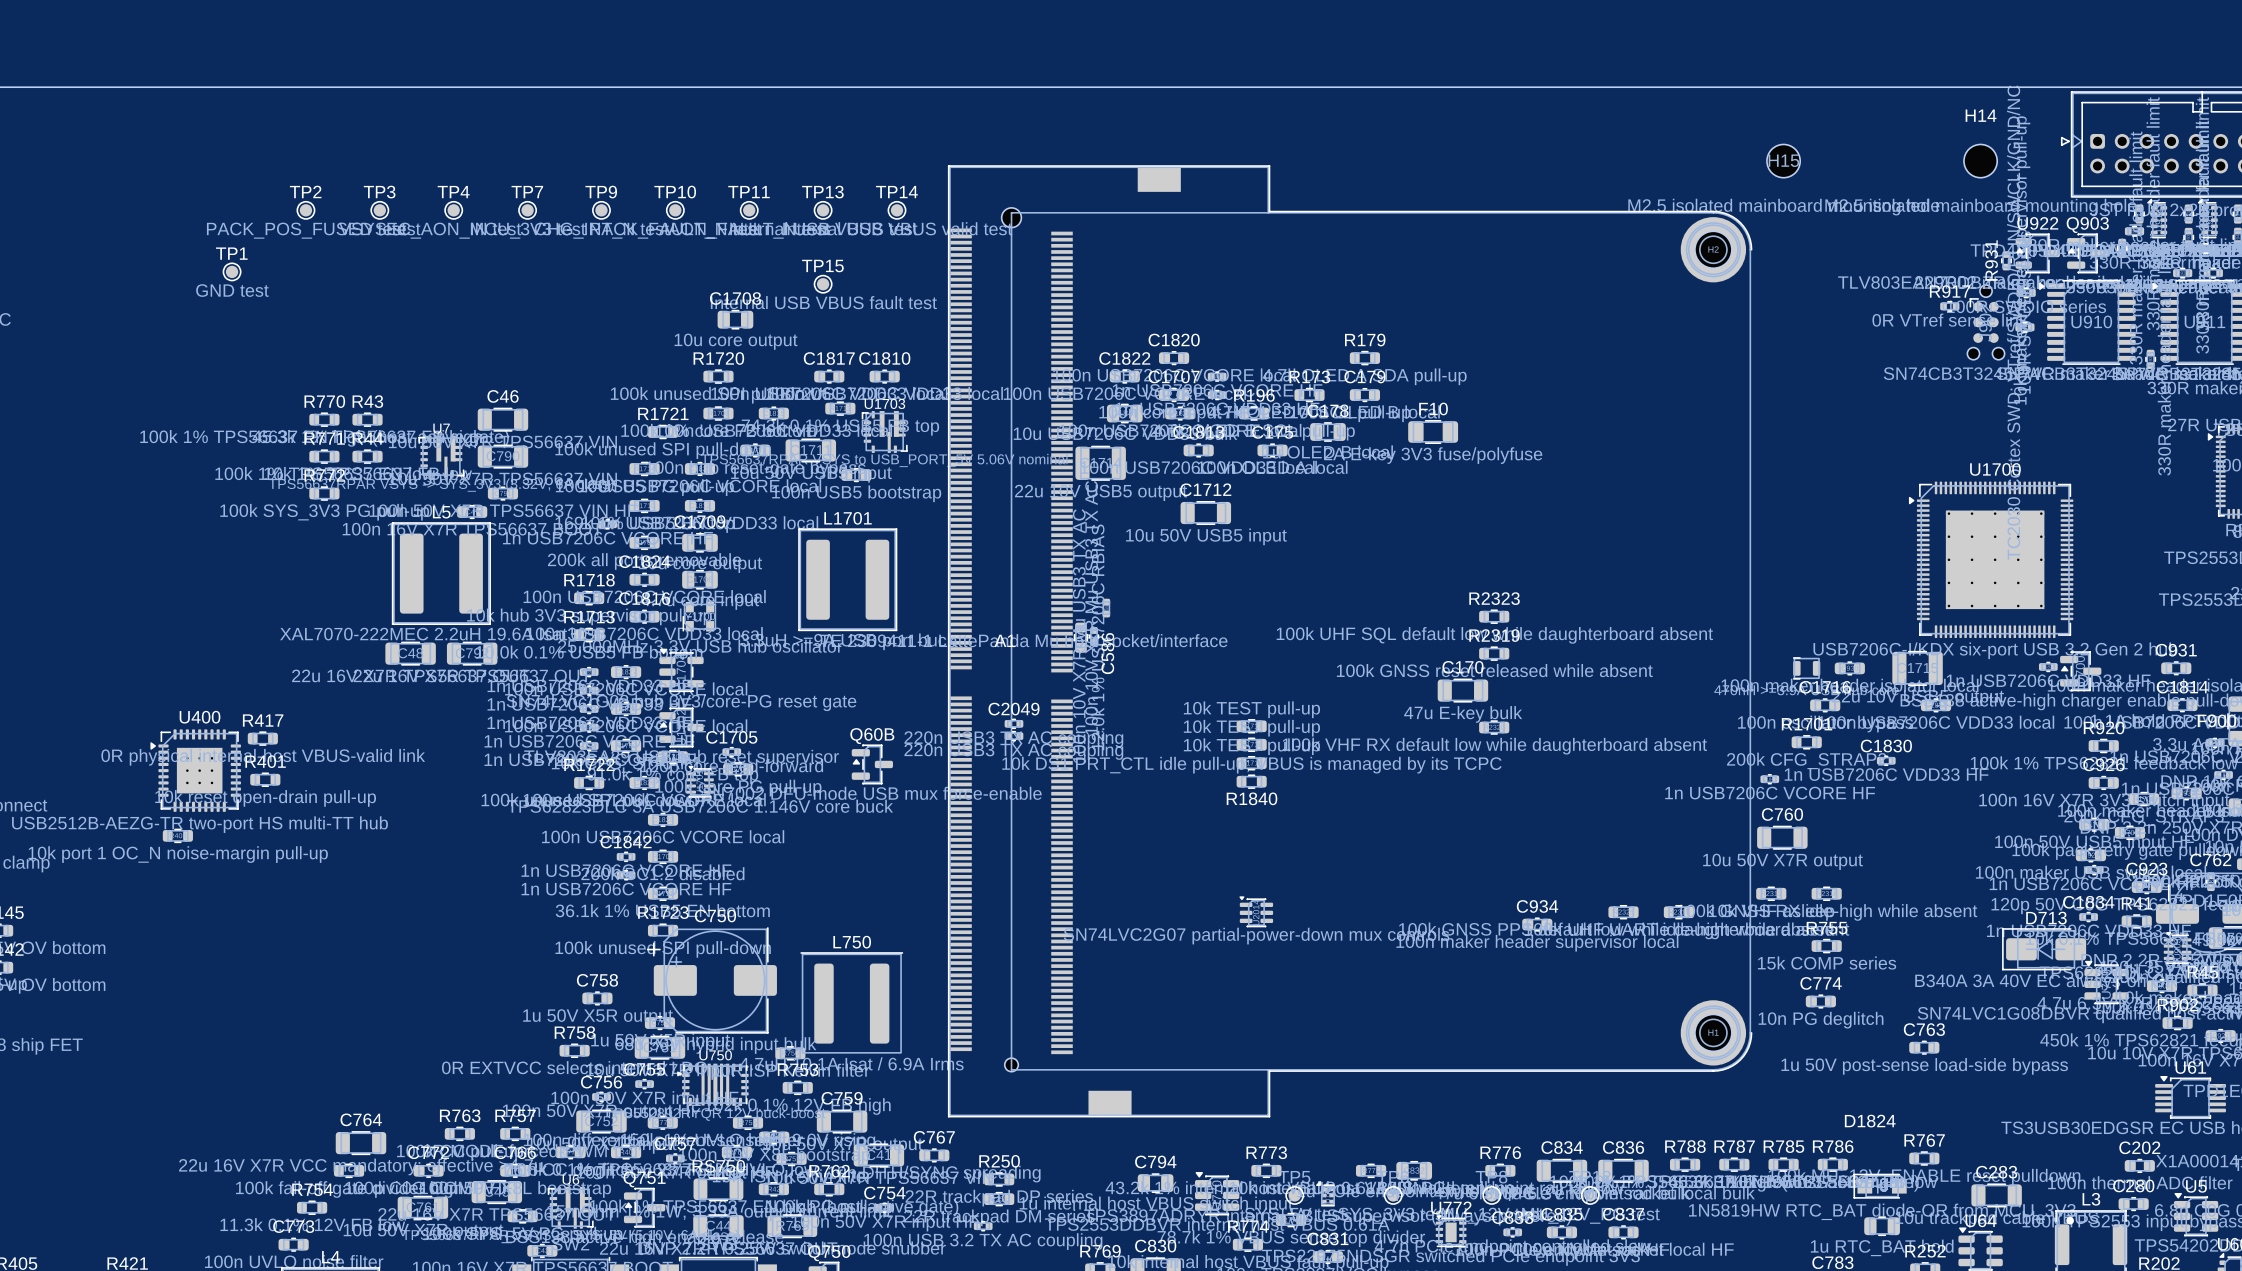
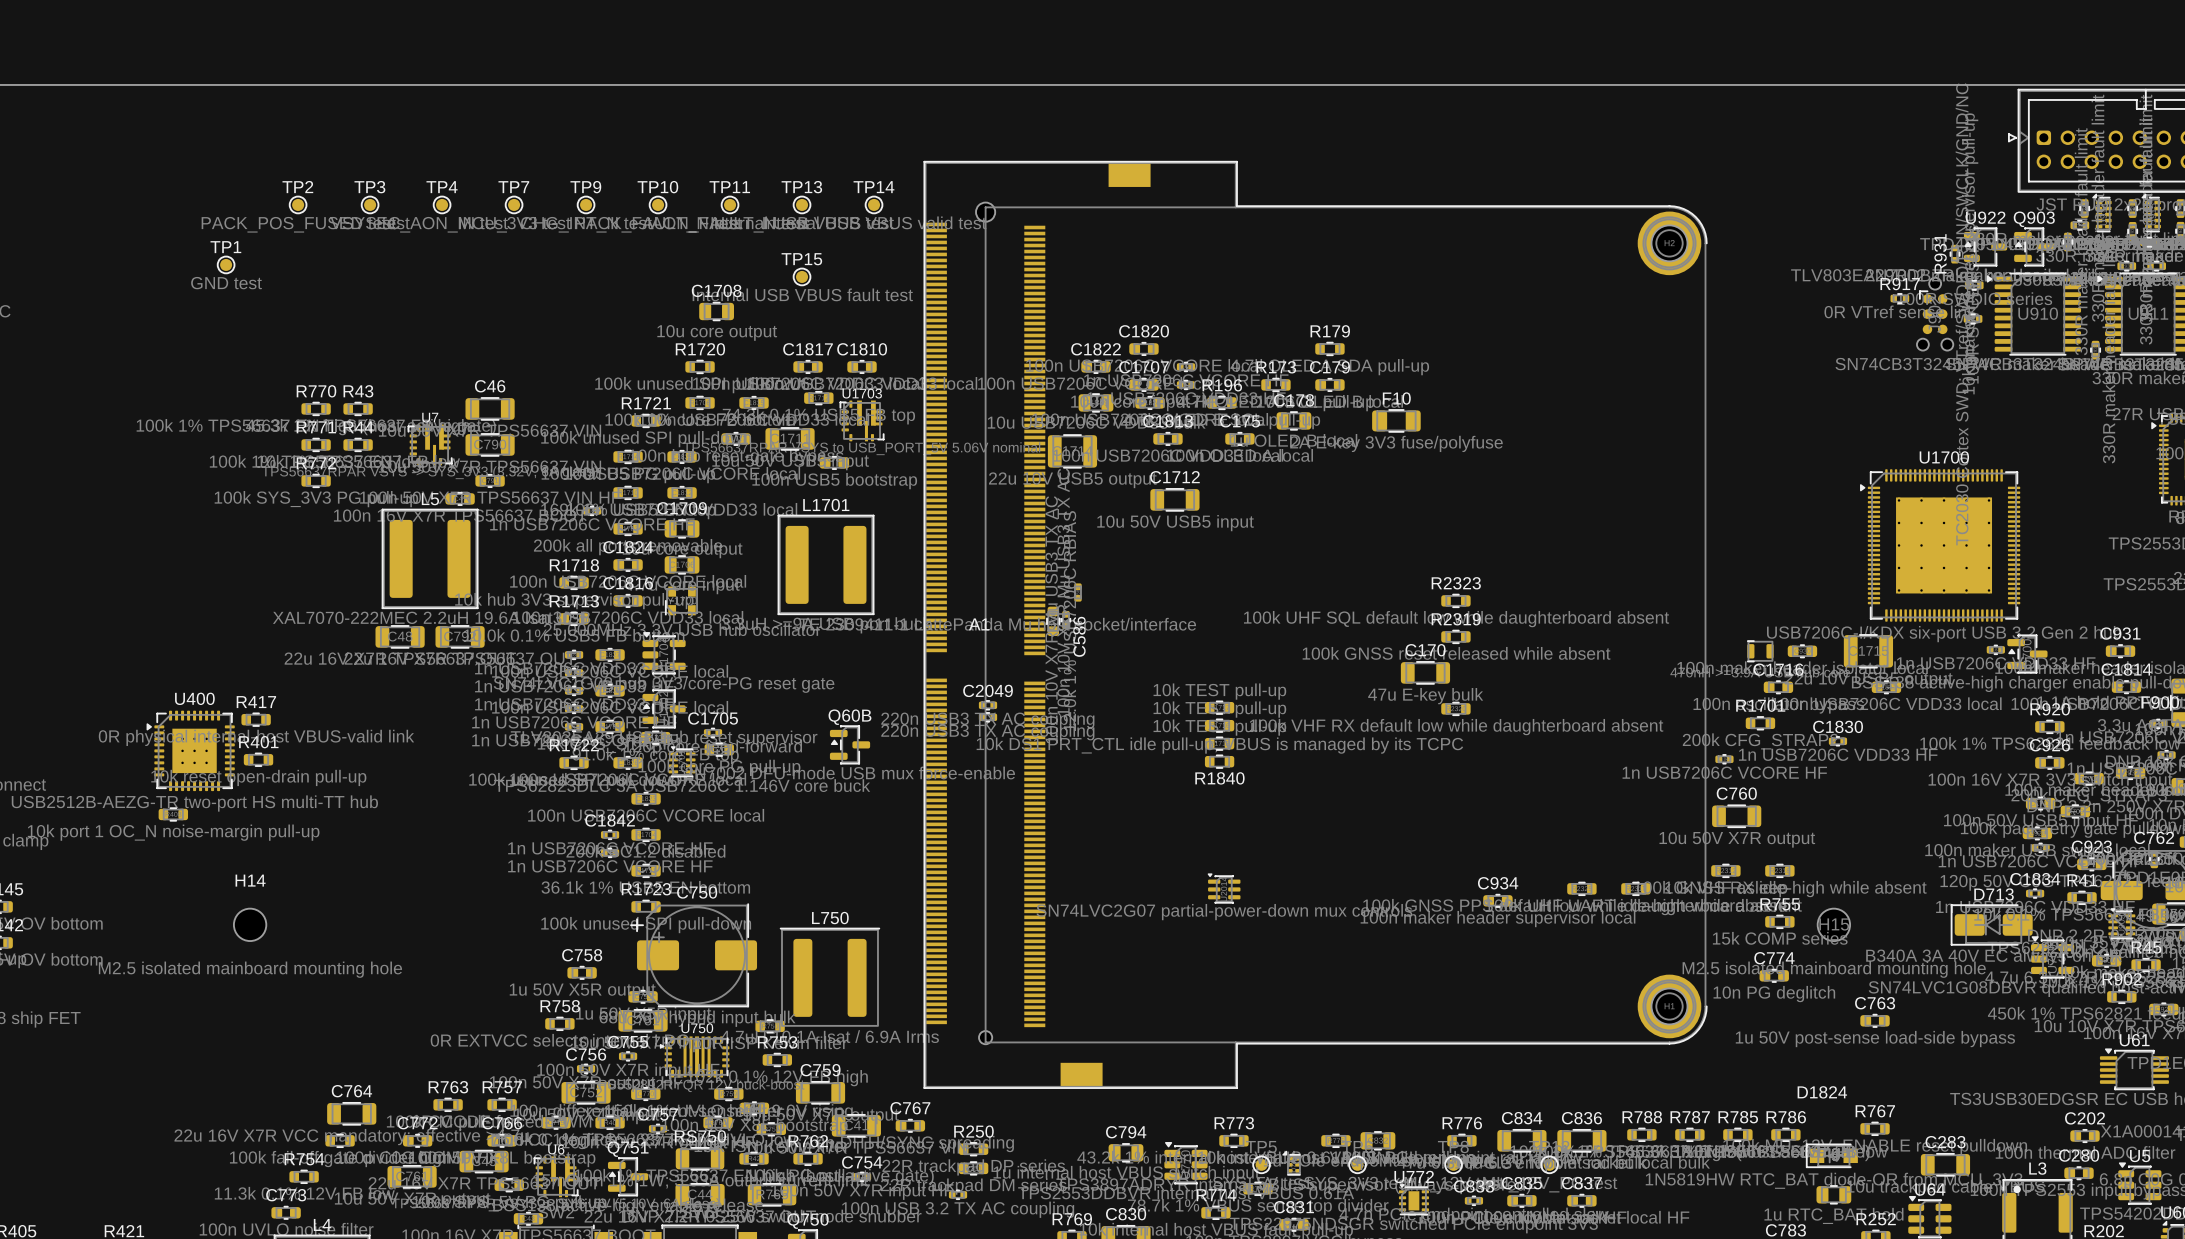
H15 position: (1783, 161) -> (1833, 924)
H14 position: (1980, 161) -> (250, 924)

